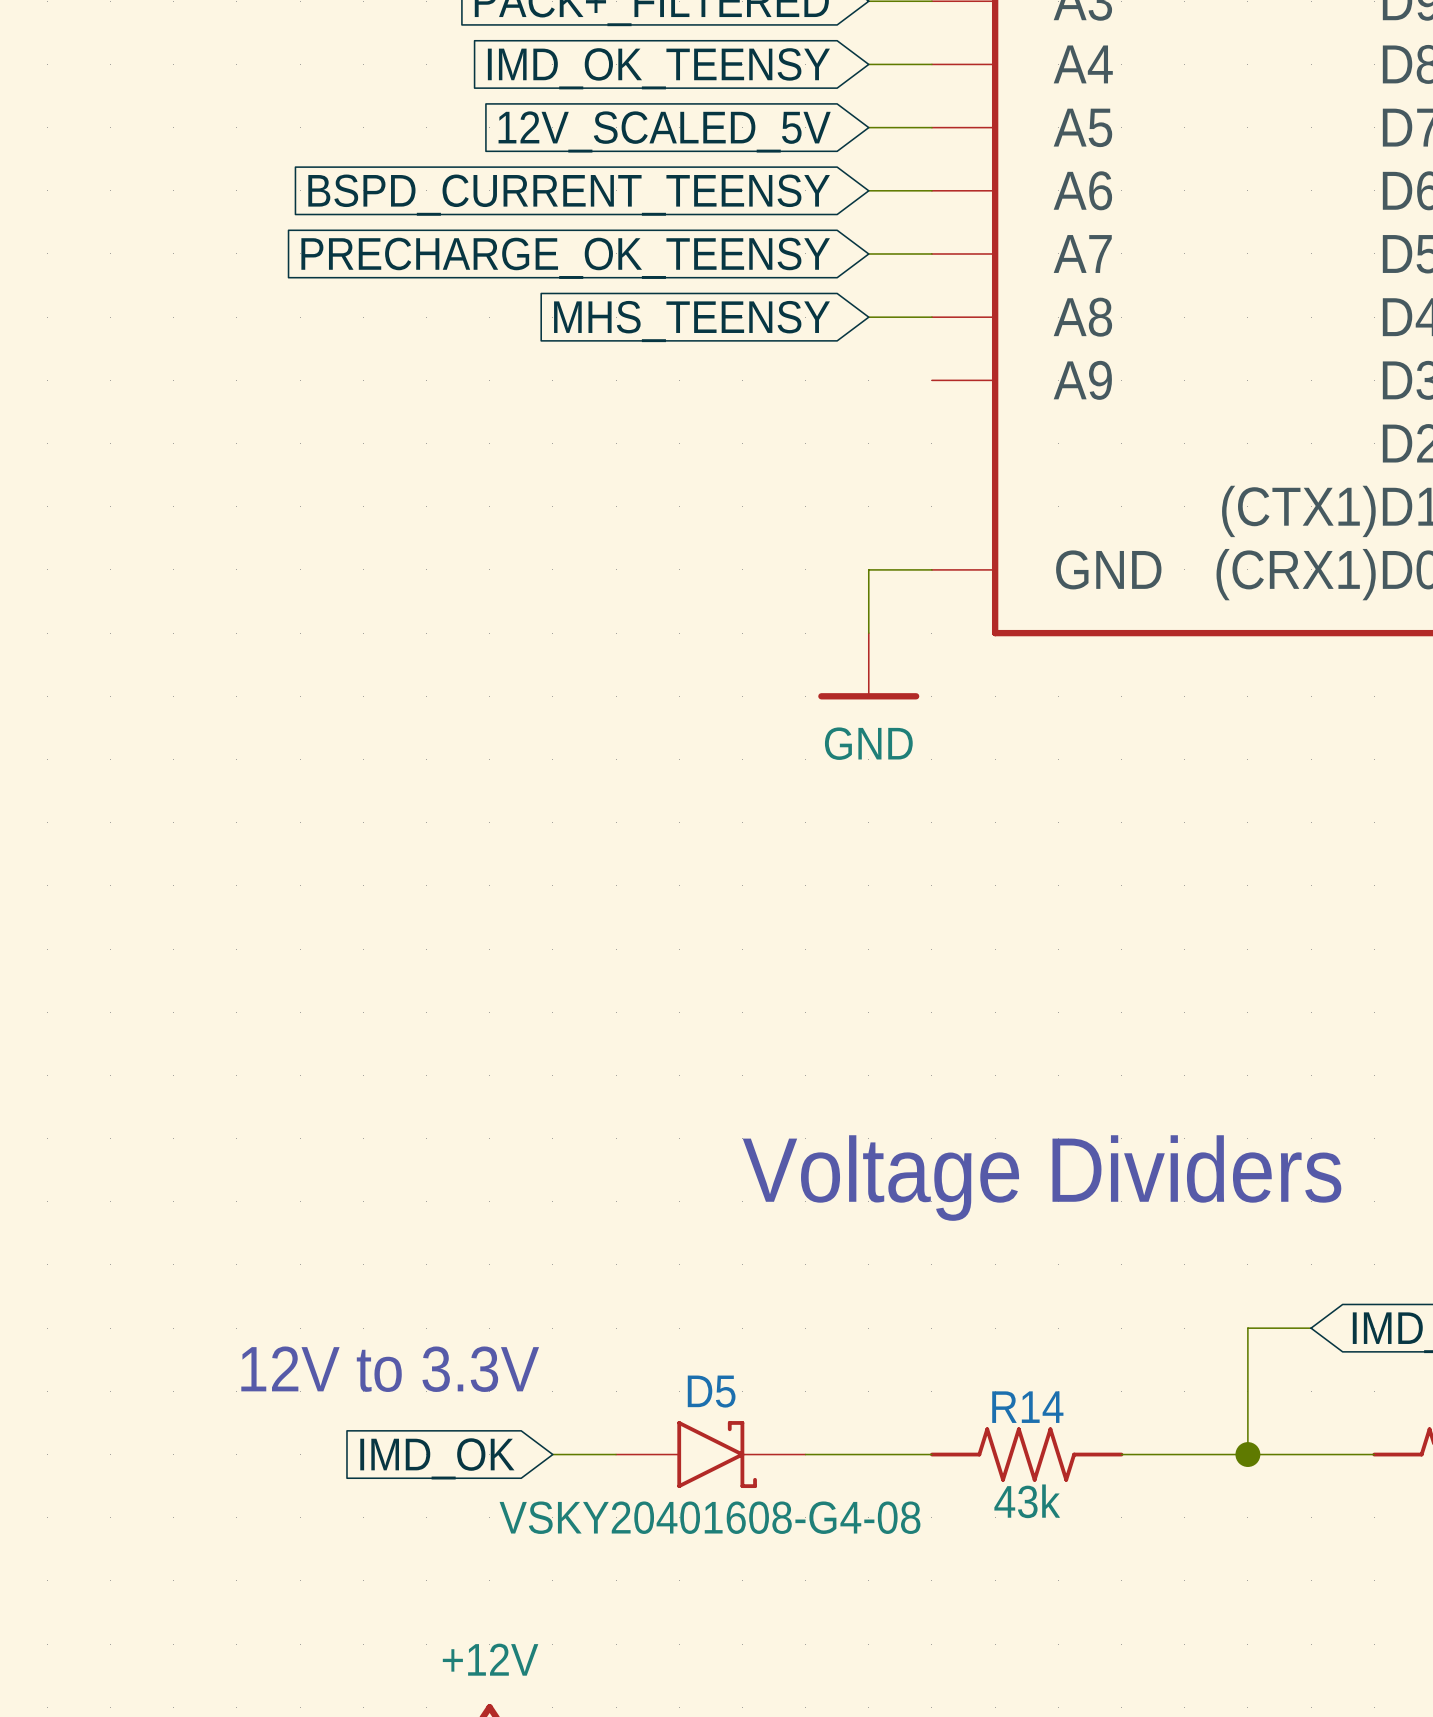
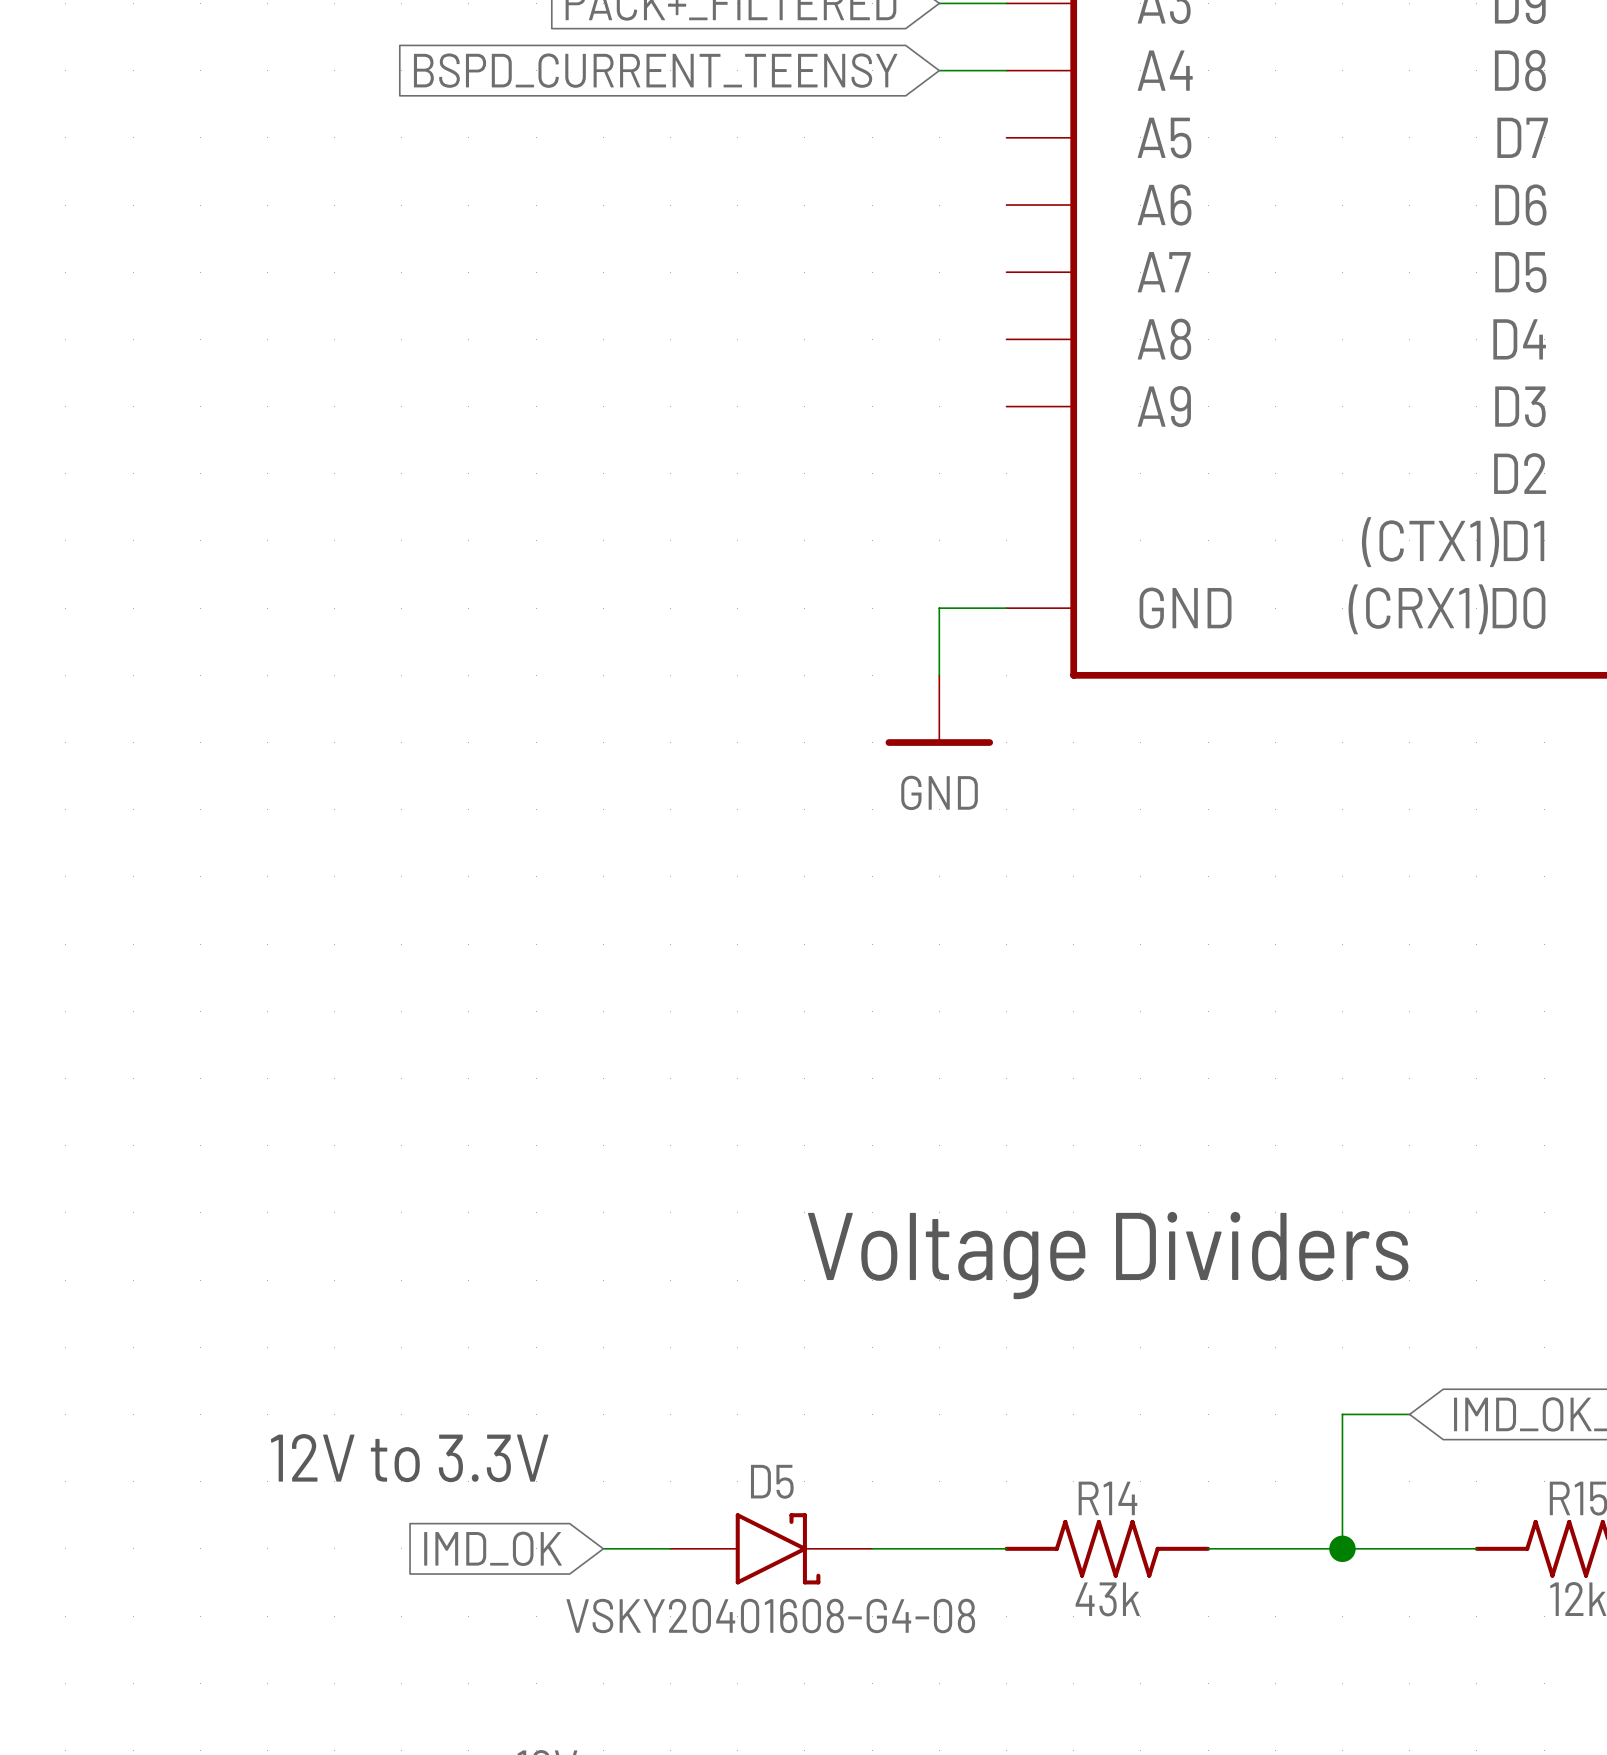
global label: IMD_OK_TEENSY (658, 68) -> BSPD_CURRENT_TEENSY (655, 70)
wire: (868, 127) (931, 127) -> none
global label: 12V_SCALED_5V (664, 131) -> none
wire: (868, 190) (931, 190) -> none
global label: BSPD_CURRENT_TEENSY (569, 195) -> none
wire: (868, 253) (931, 253) -> none
global label: PRECHARGE_OK_TEENSY (565, 258) -> none
wire: (868, 317) (931, 317) -> none
global label: MHS_TEENSY (692, 321) -> none

